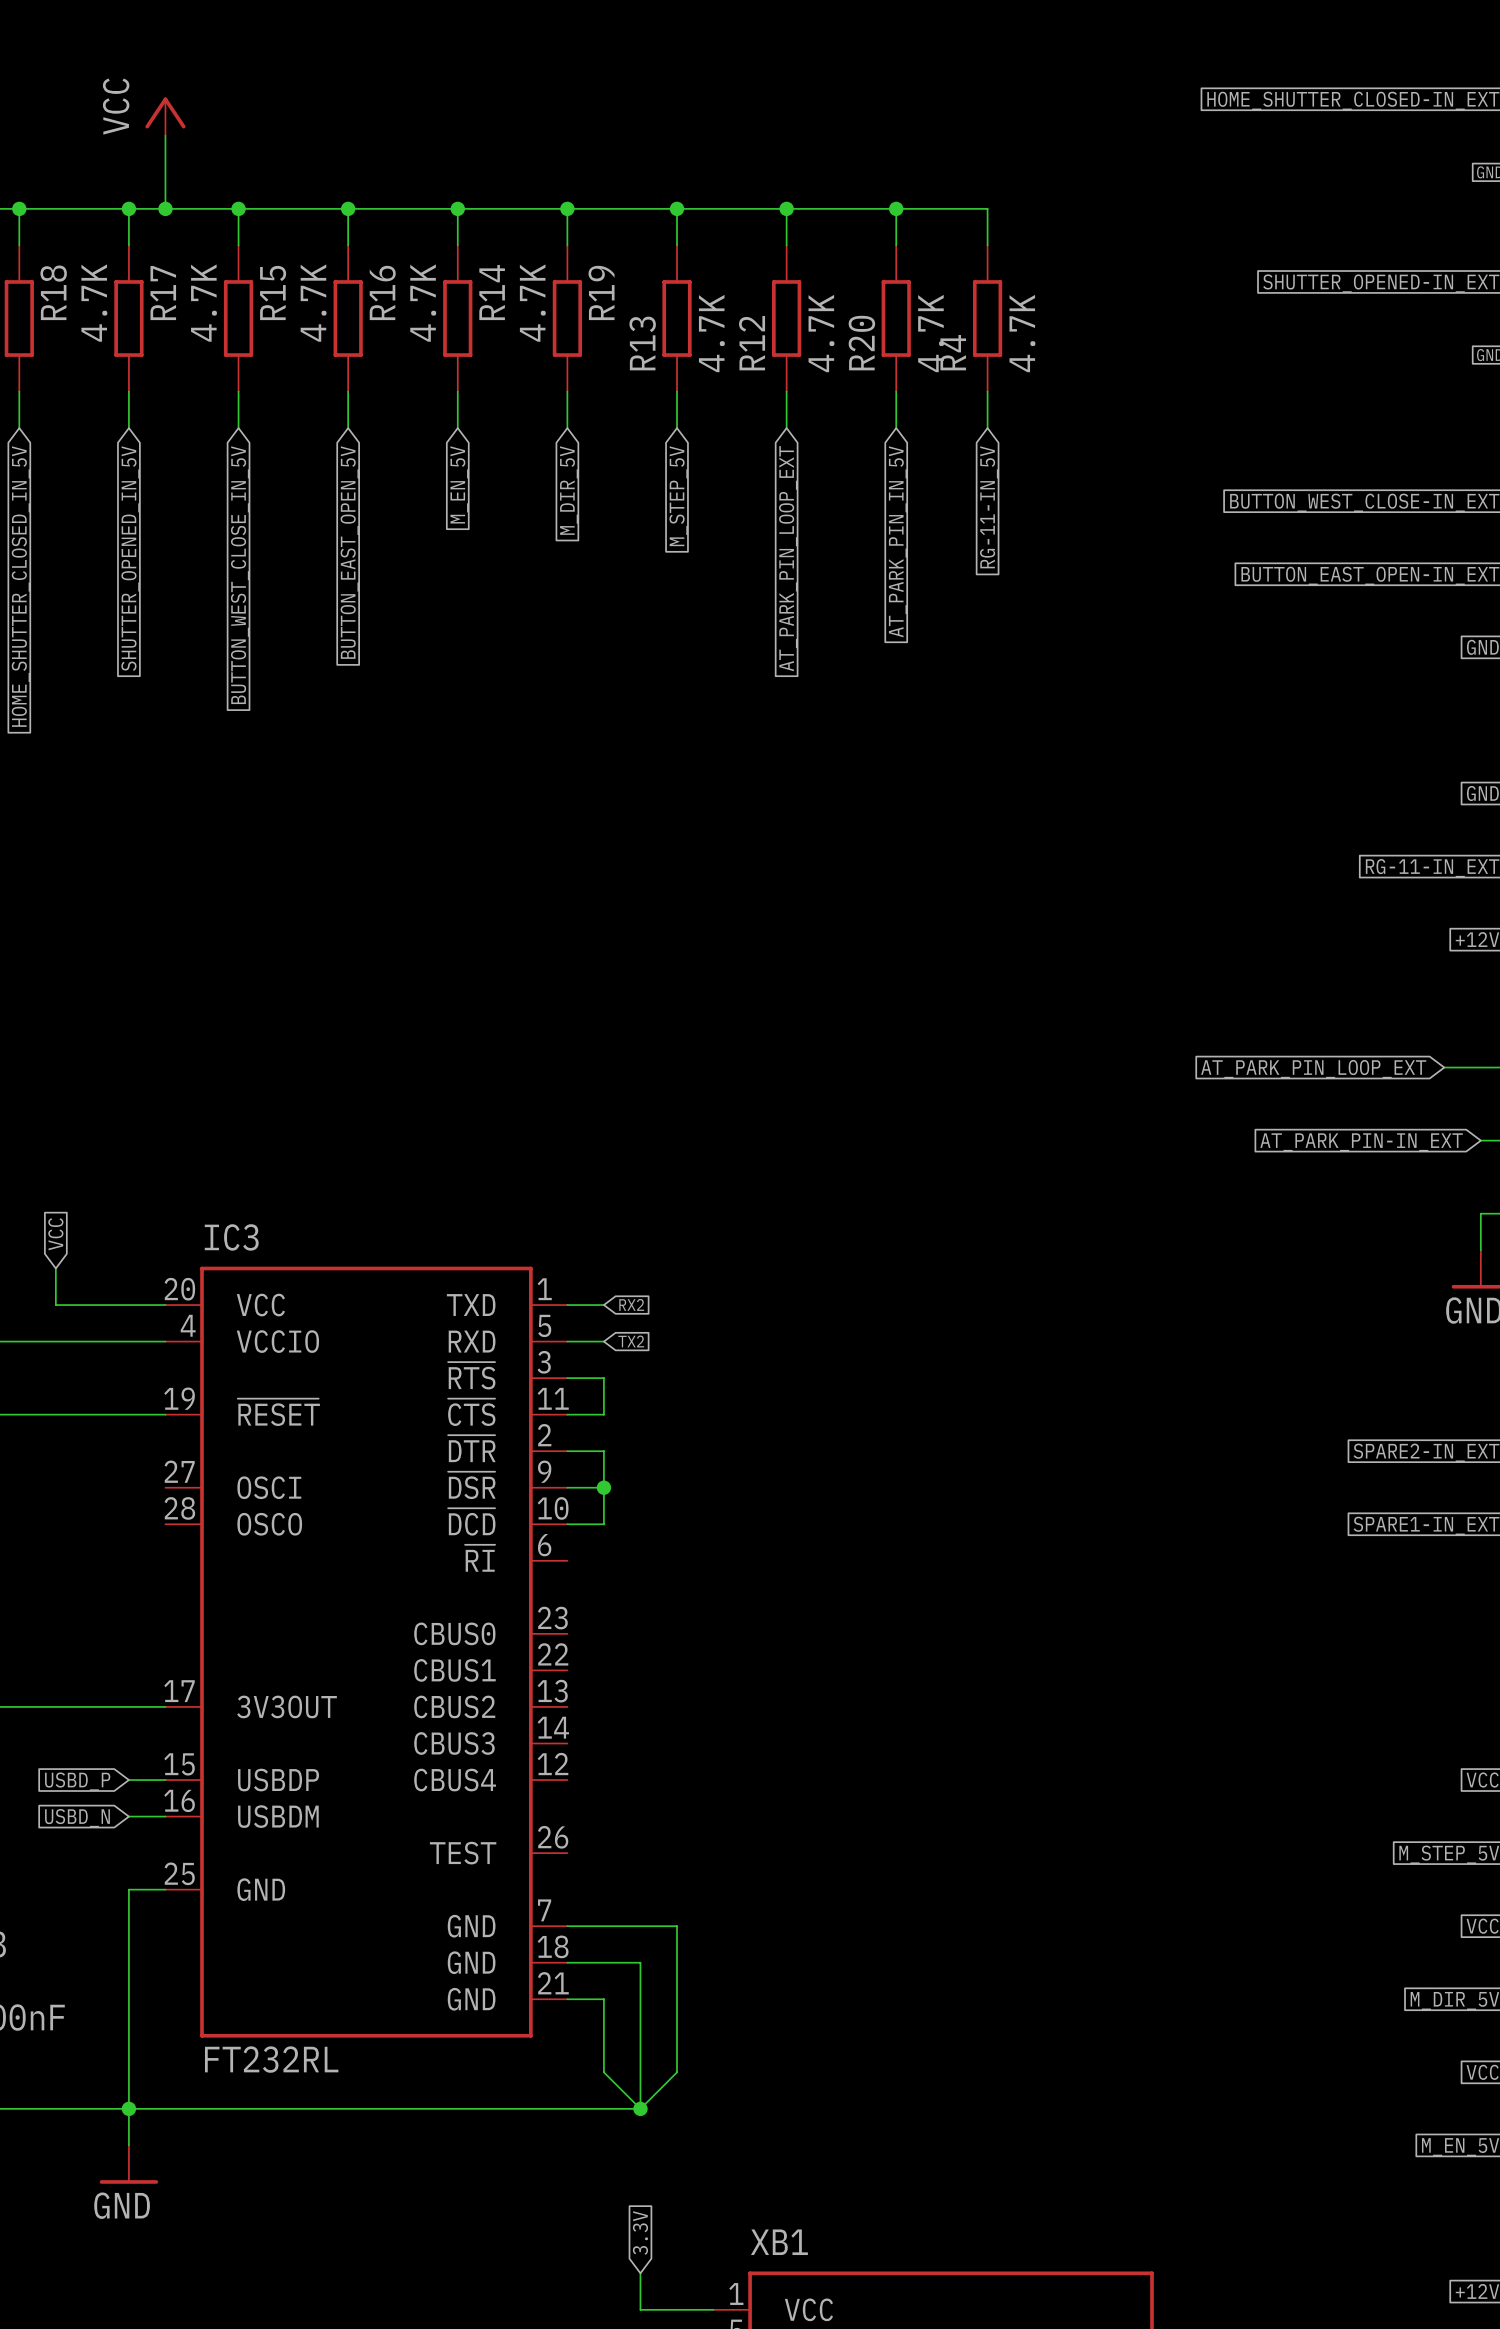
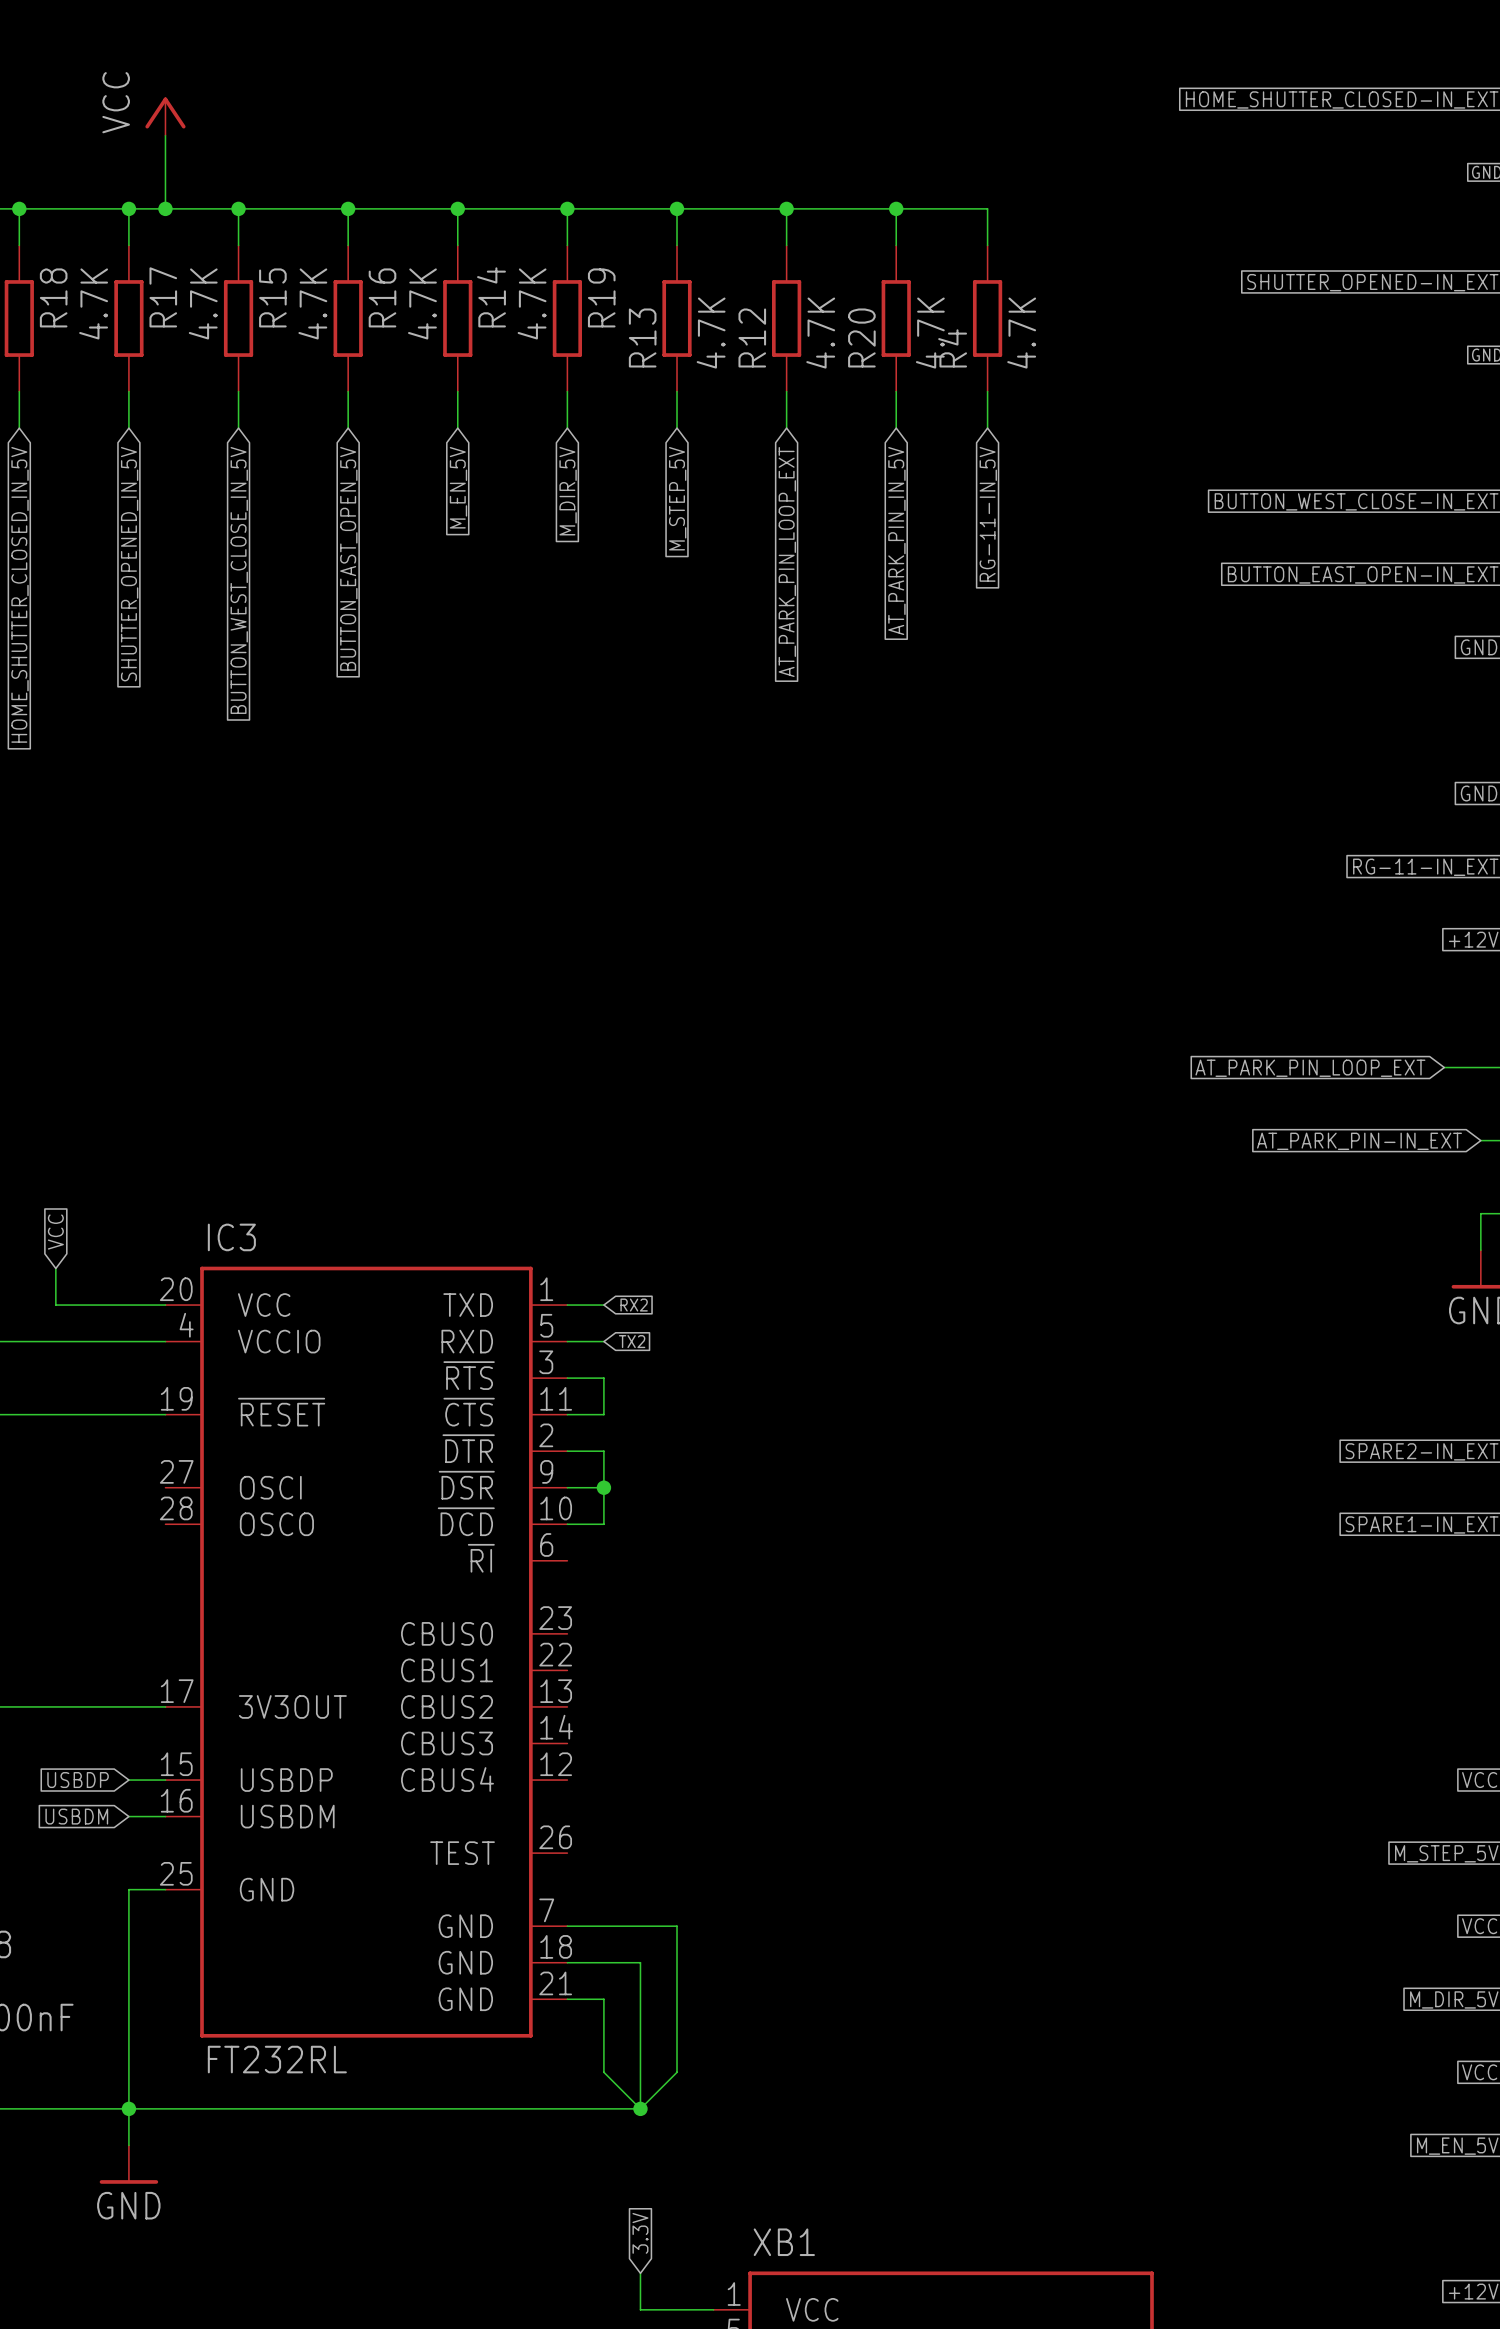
global label: USBD_P (77, 1781) -> USBDP (78, 1780)
global label: USBD_N (77, 1818) -> USBDM (76, 1816)

